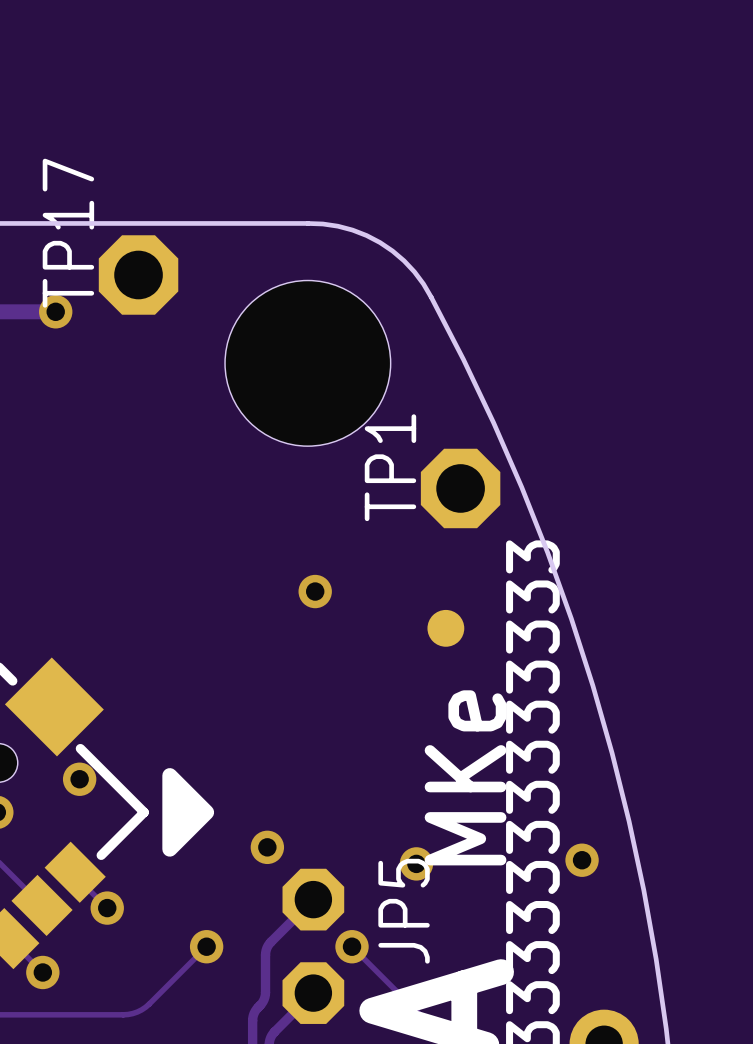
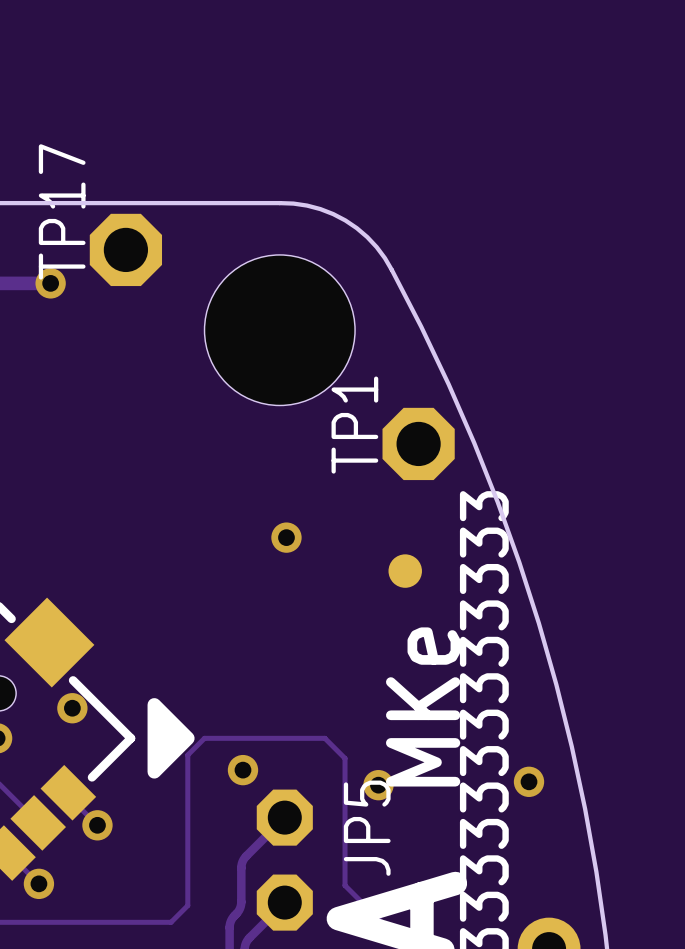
track: (206, 946) (145, 1007) (132, 1013) (123, 1014) -> (345, 885) (345, 758) (324, 738) (204, 738) (187, 755) (187, 905) (171, 922) (112, 922)
via: (206, 946) -> none
track: (352, 946) (379, 974) -> none
via: (352, 946) -> none

